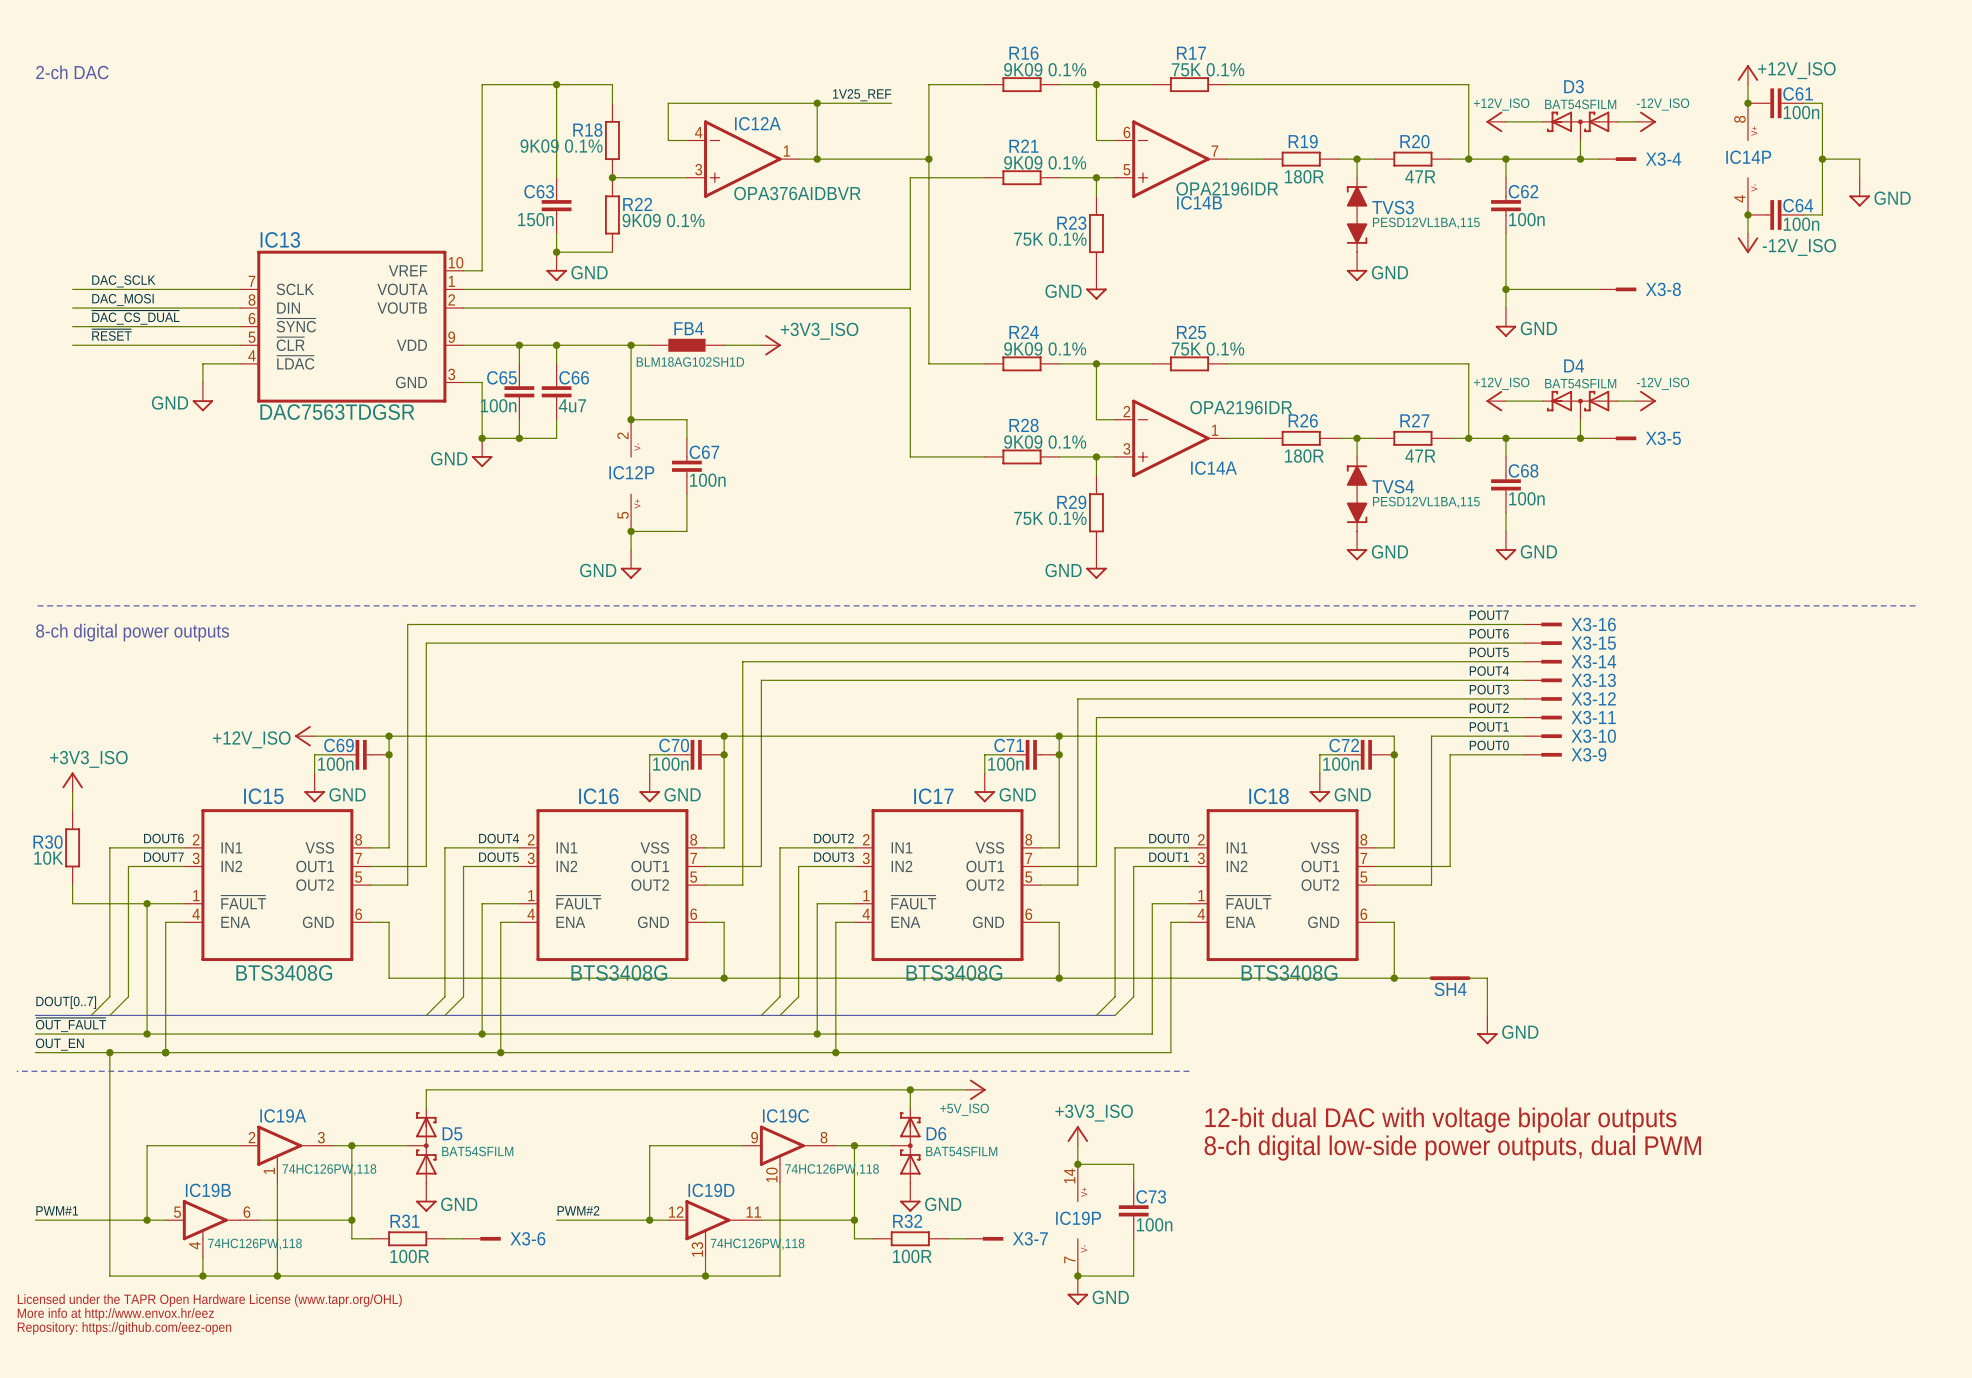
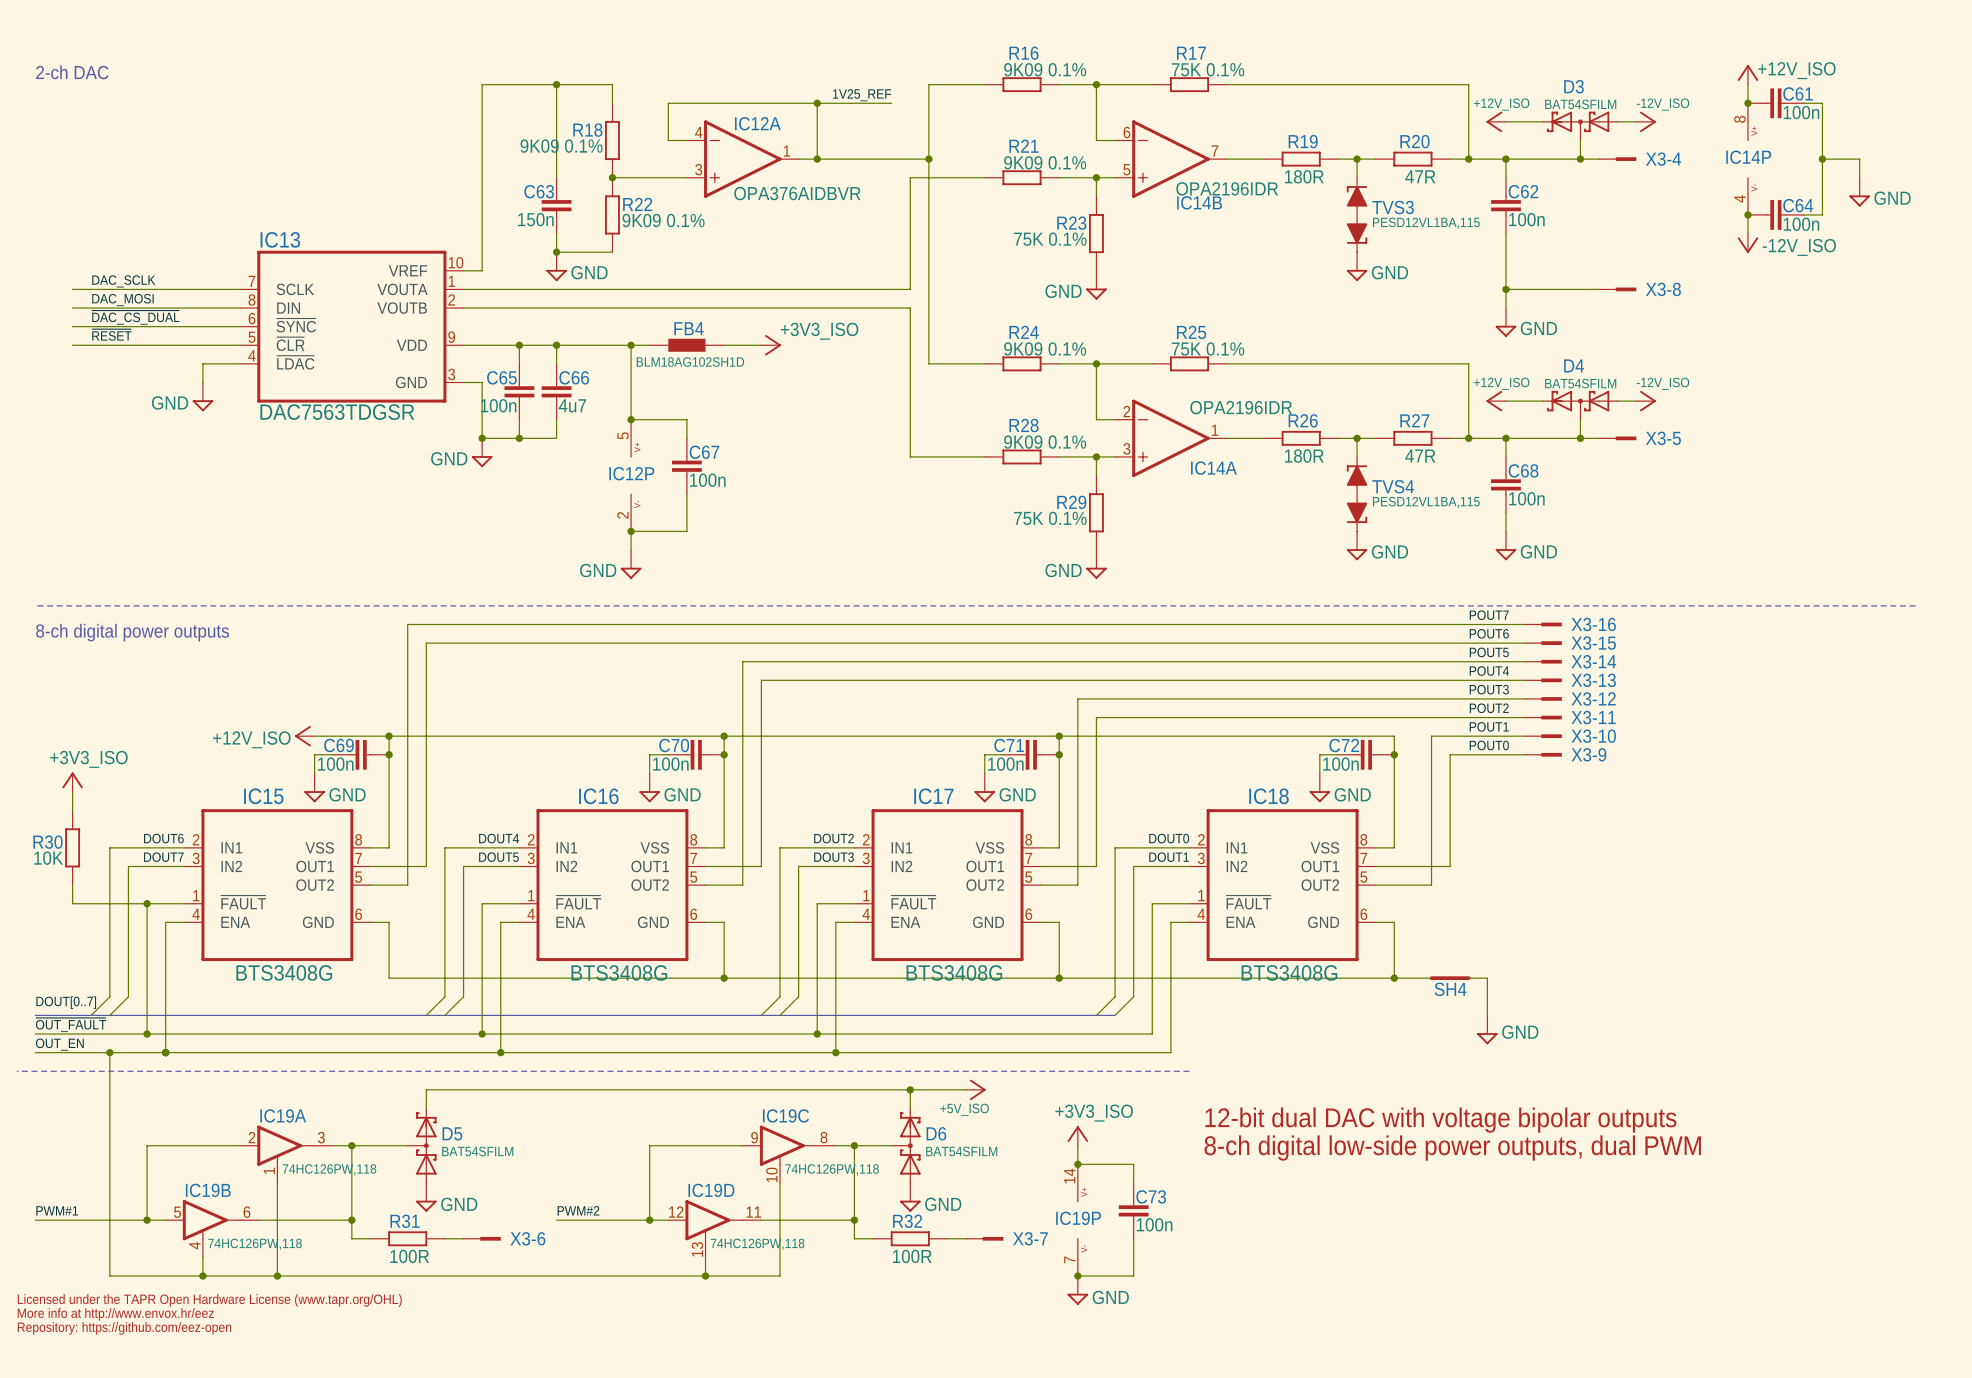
IC12P flip: as is (631, 475) -> up-down (631, 475)

